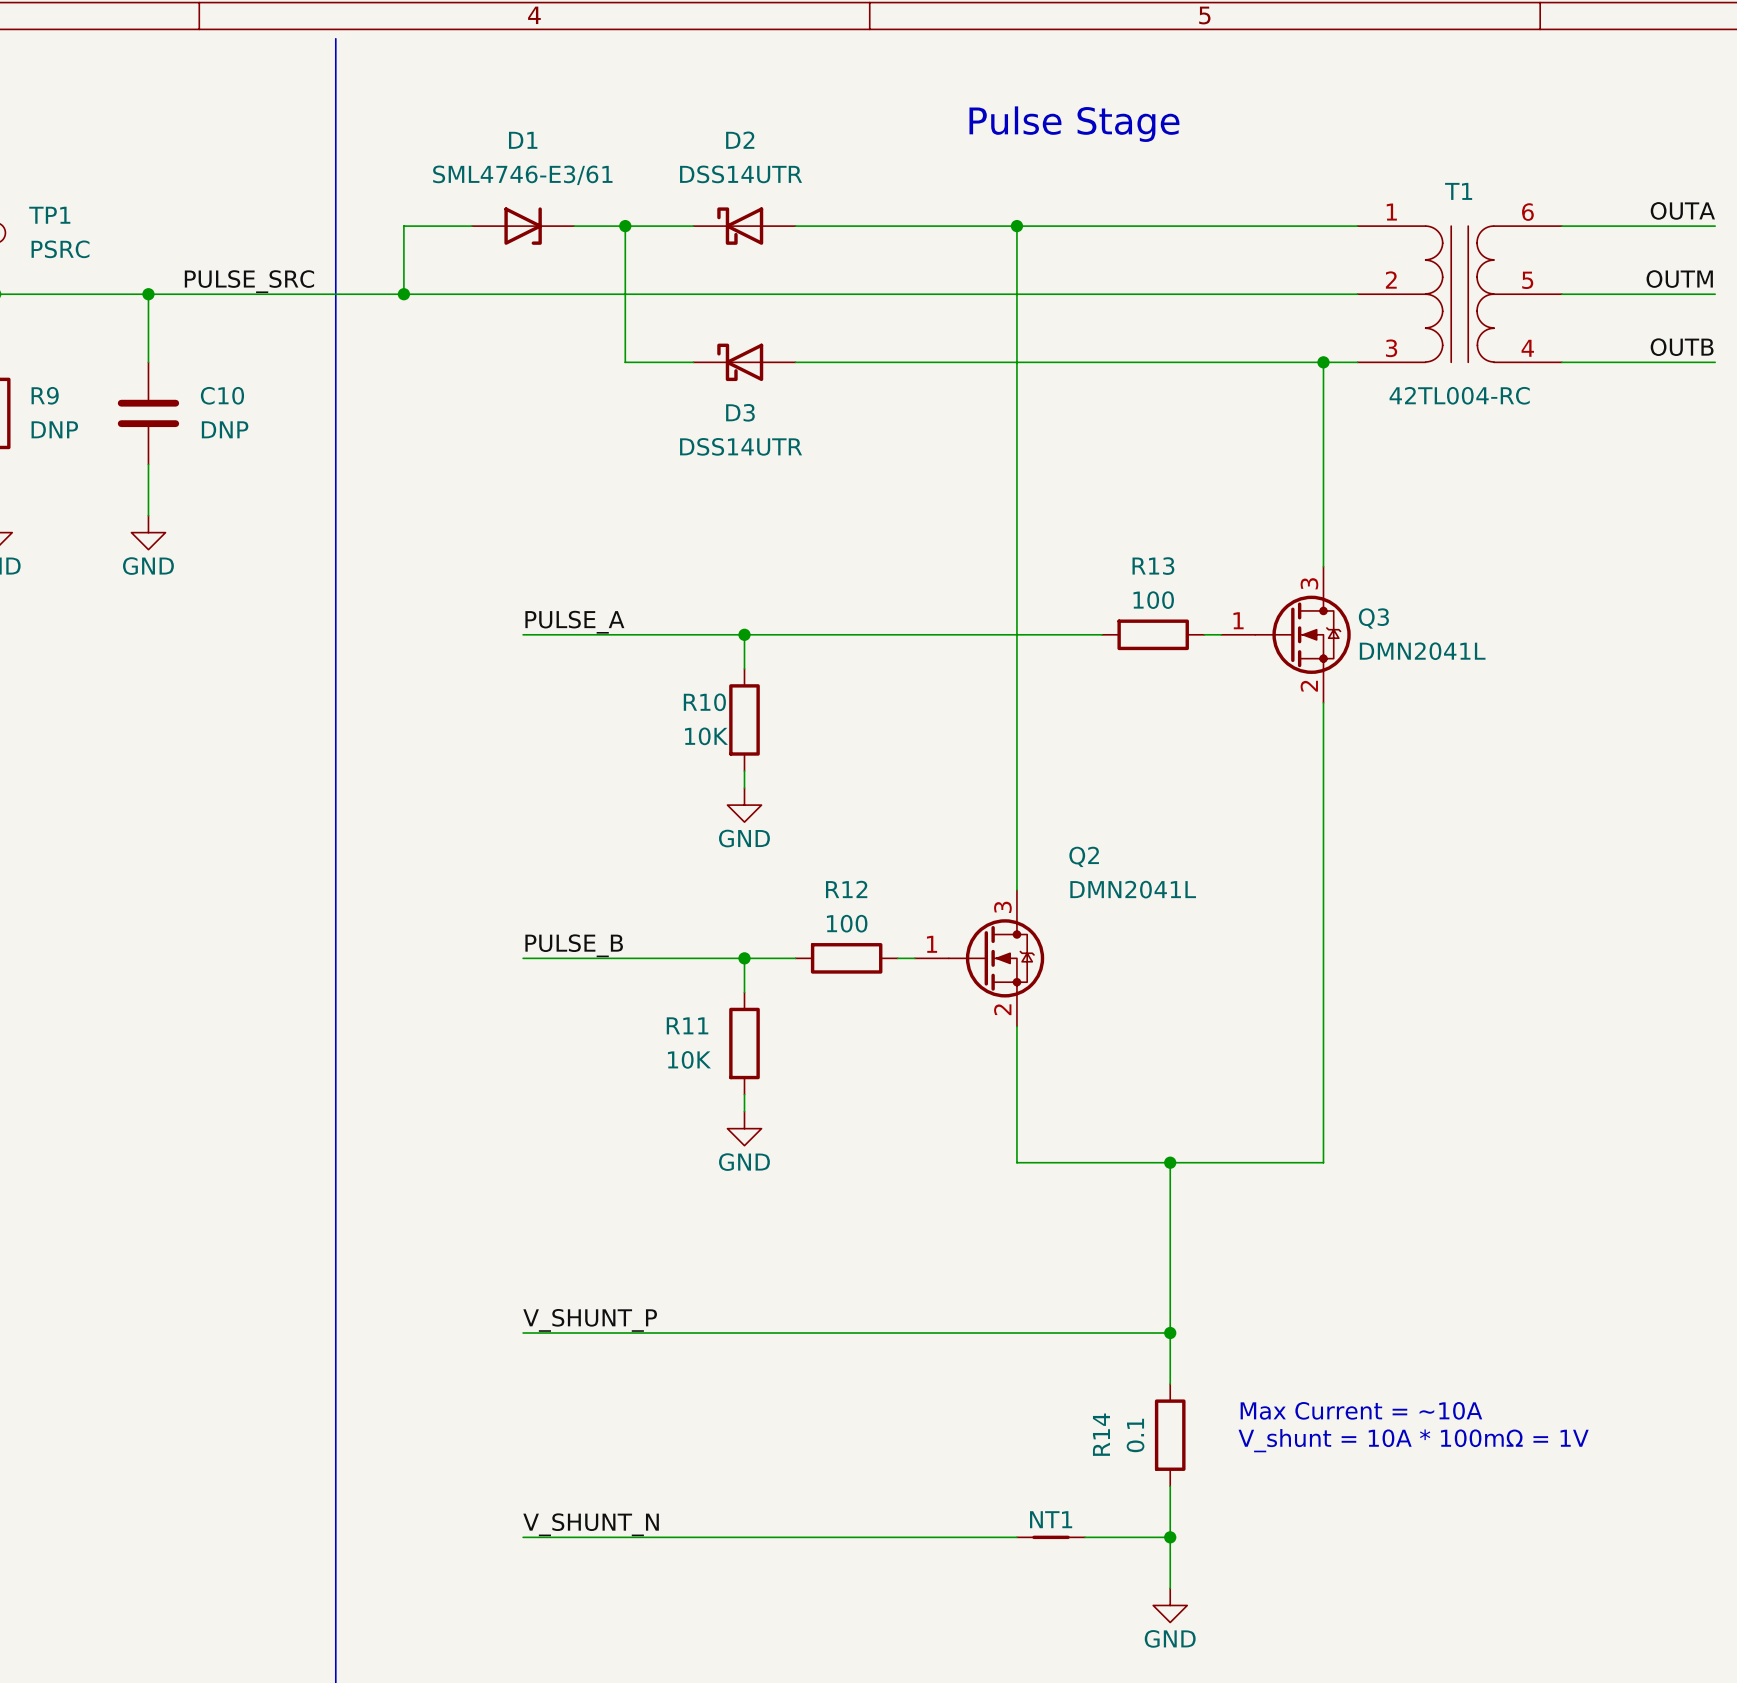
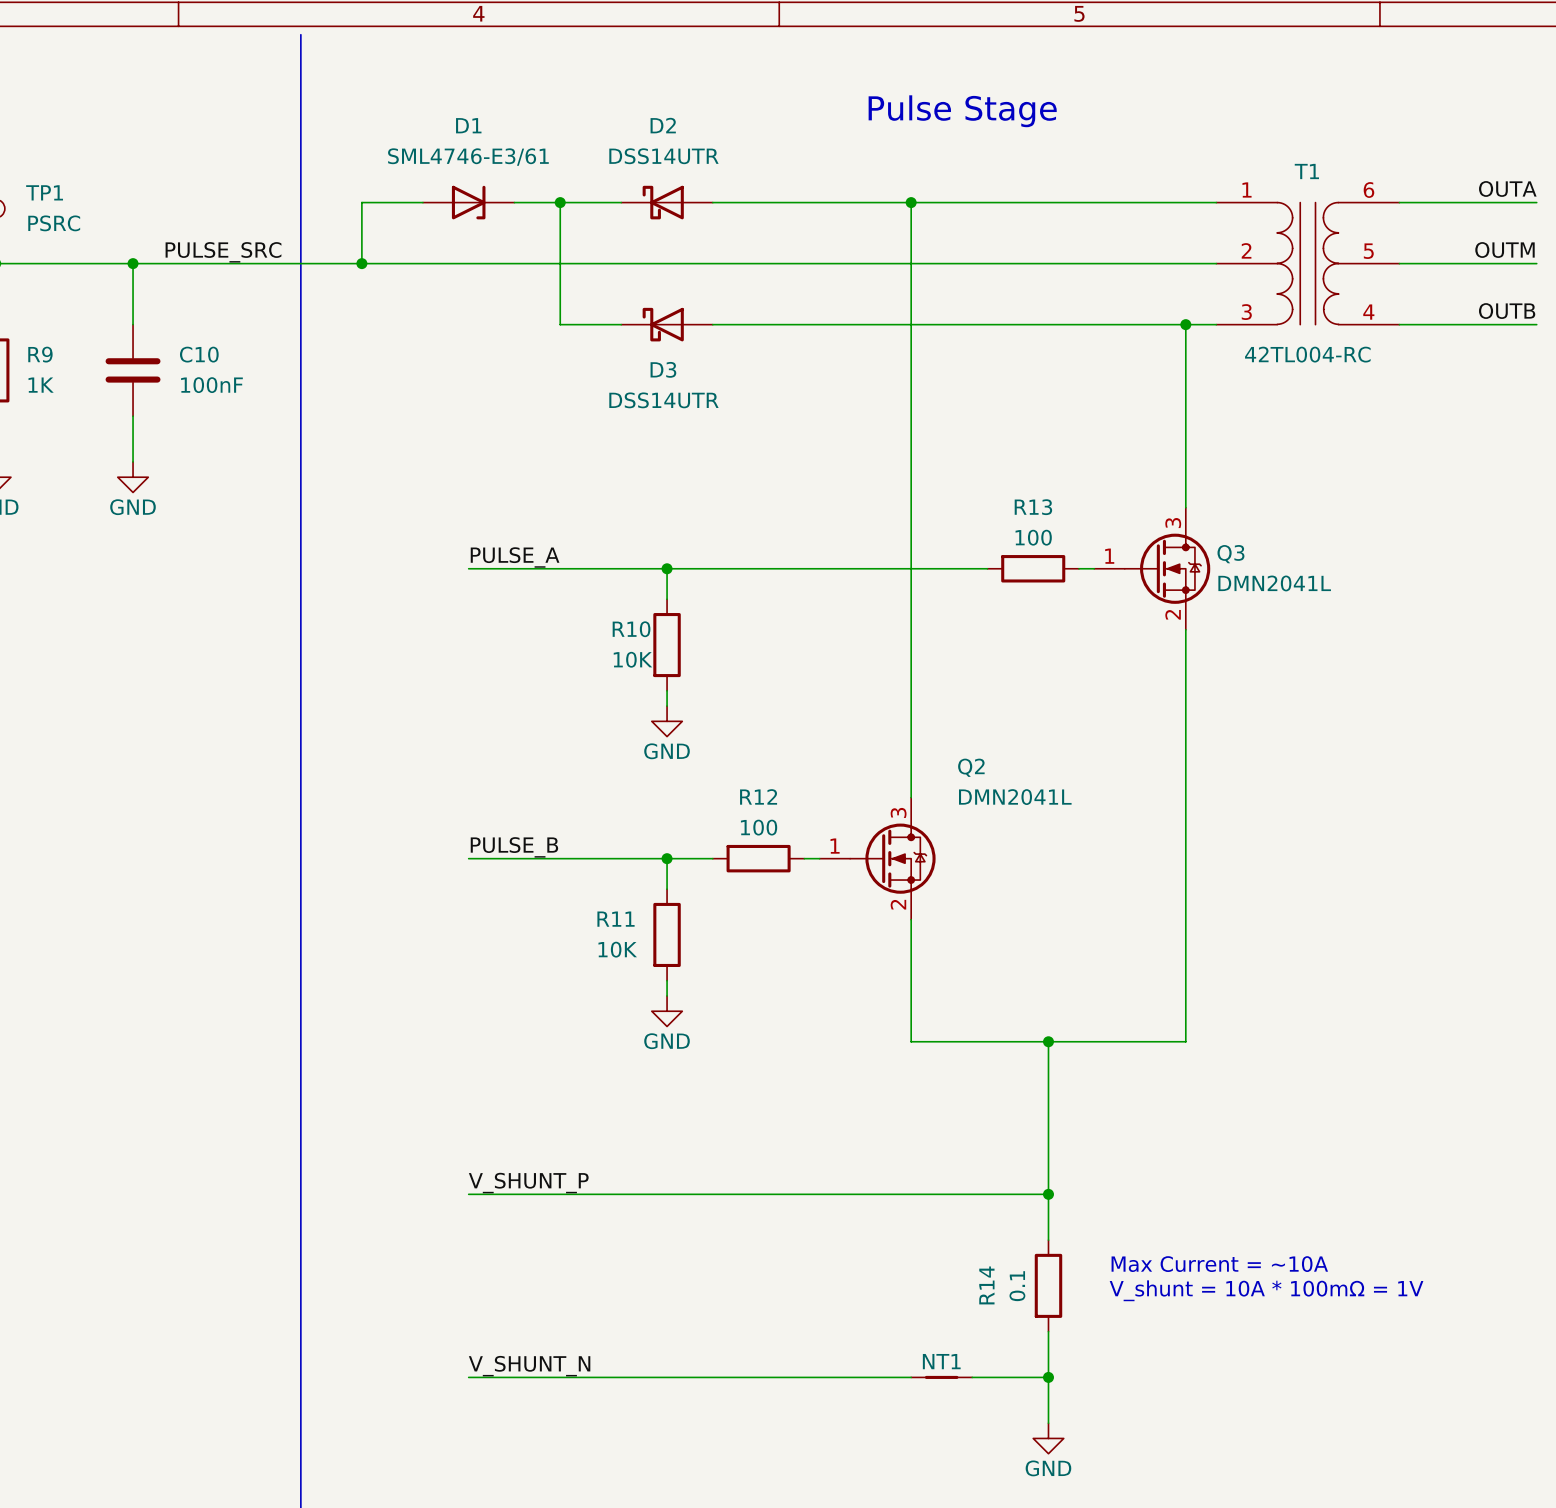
R9 value: DNP (54, 429) -> 1K (41, 385)
C10 value: DNP (225, 429) -> 100nF (211, 385)

